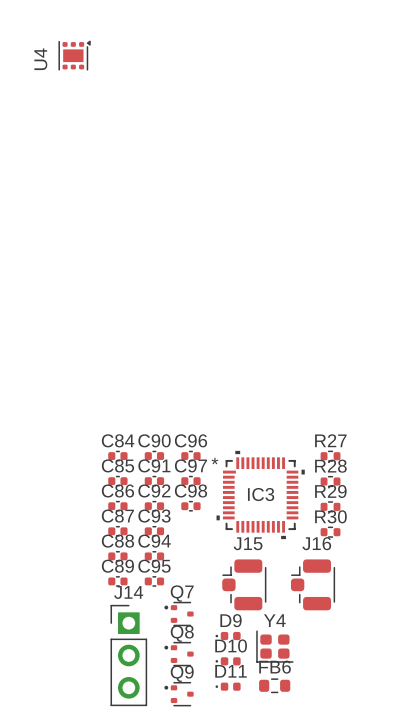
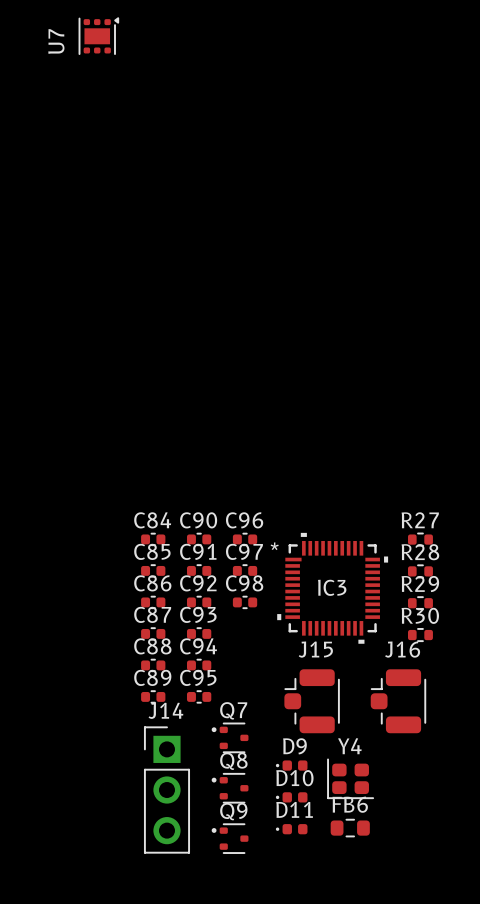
U4 name: U4 (40, 59) -> U7 (56, 41)

